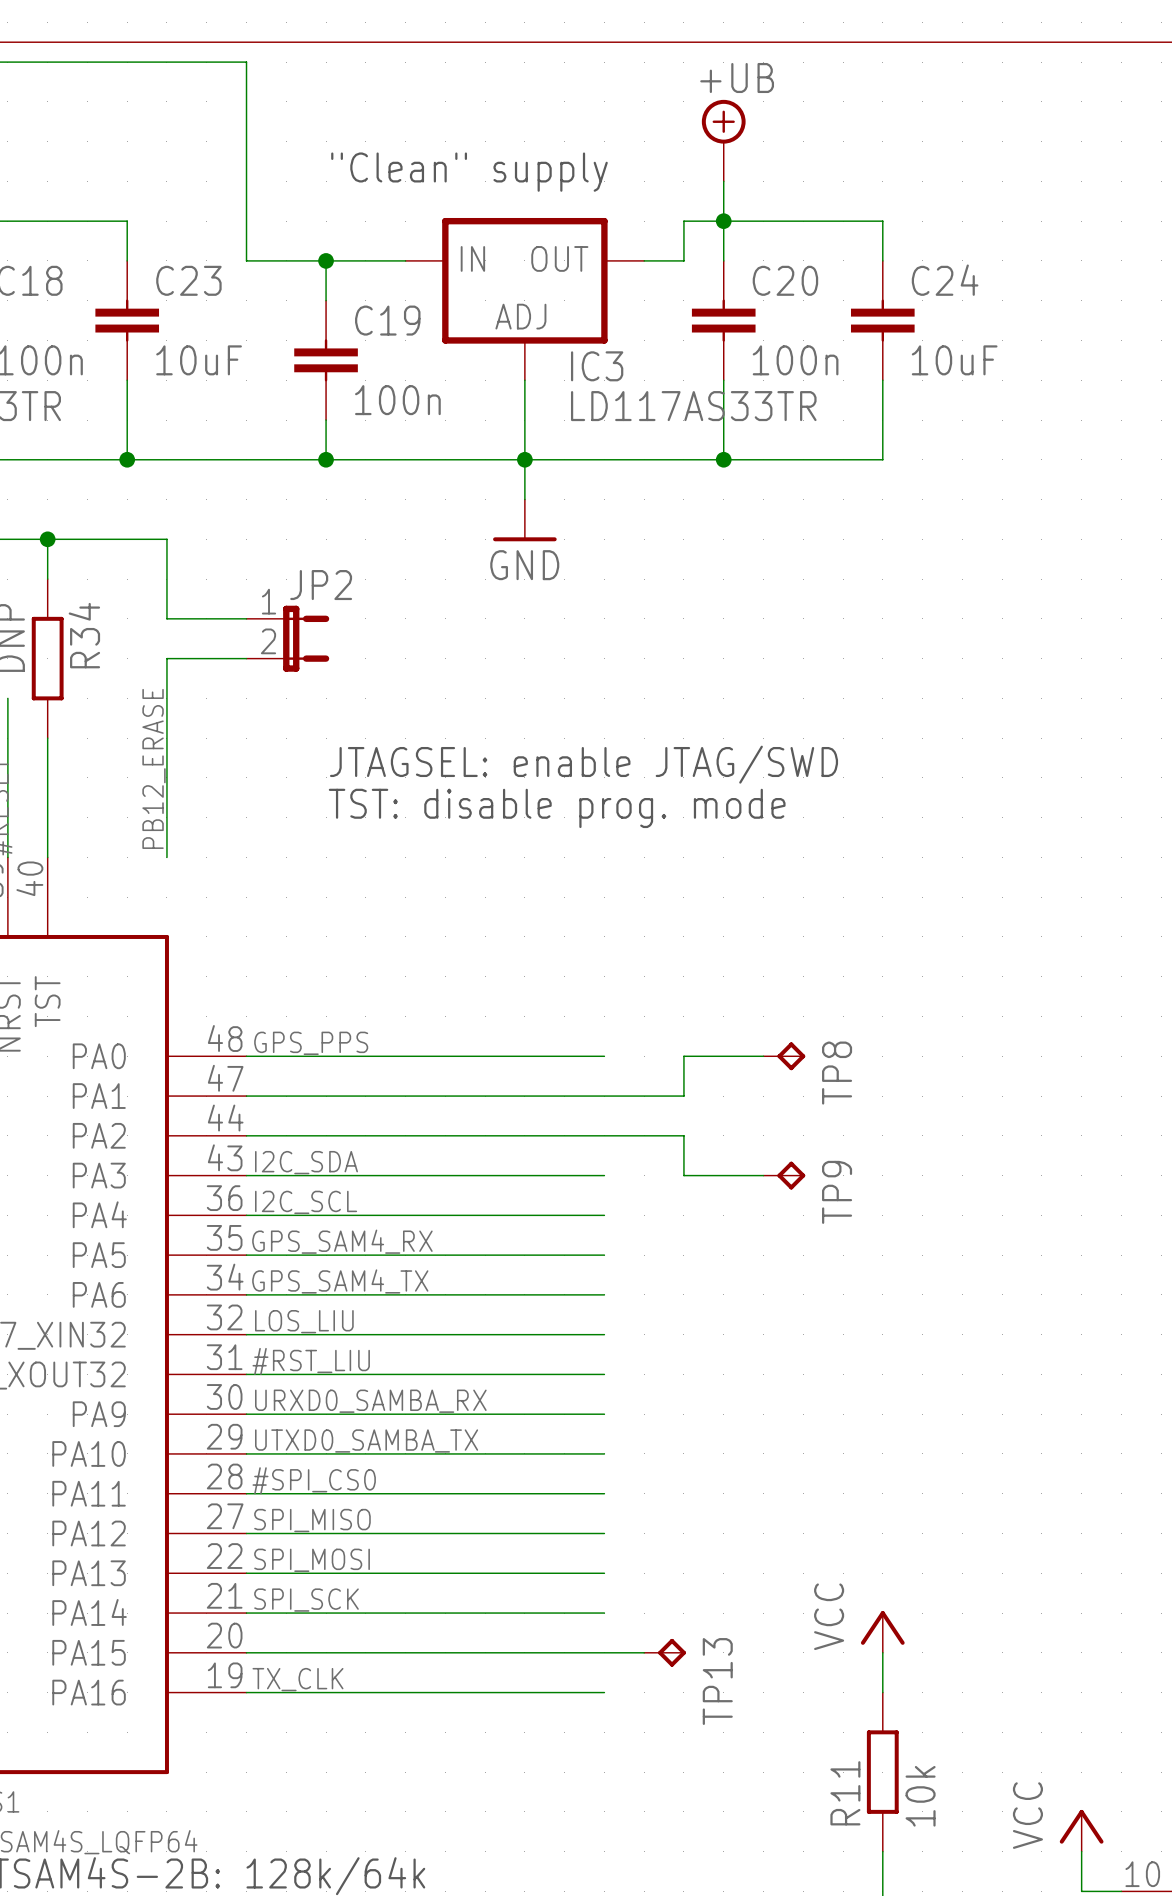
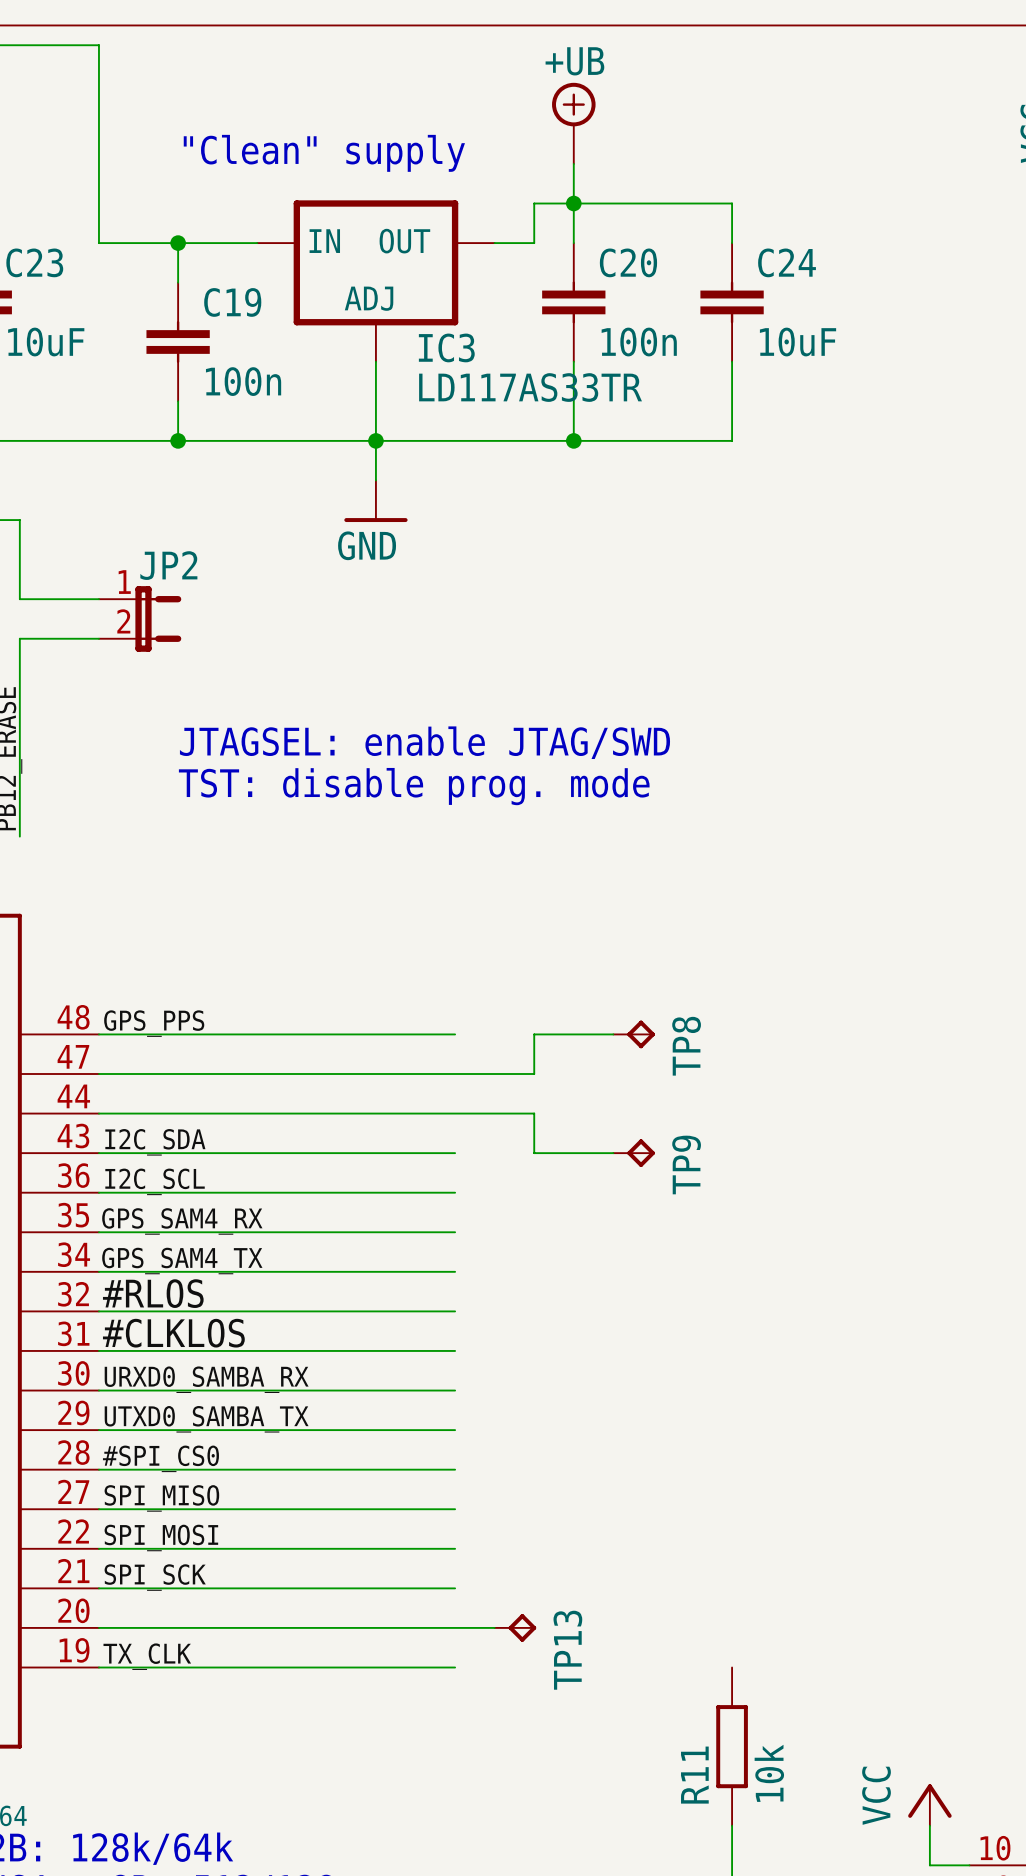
label: LOS_LIU (304, 1321) -> #RLOS (153, 1293)
label: #RST_LIU (311, 1361) -> #CLKLOS (173, 1333)
power symbol: VCC (882, 1631) -> none
wire: (882, 1652) (882, 1692) -> none

